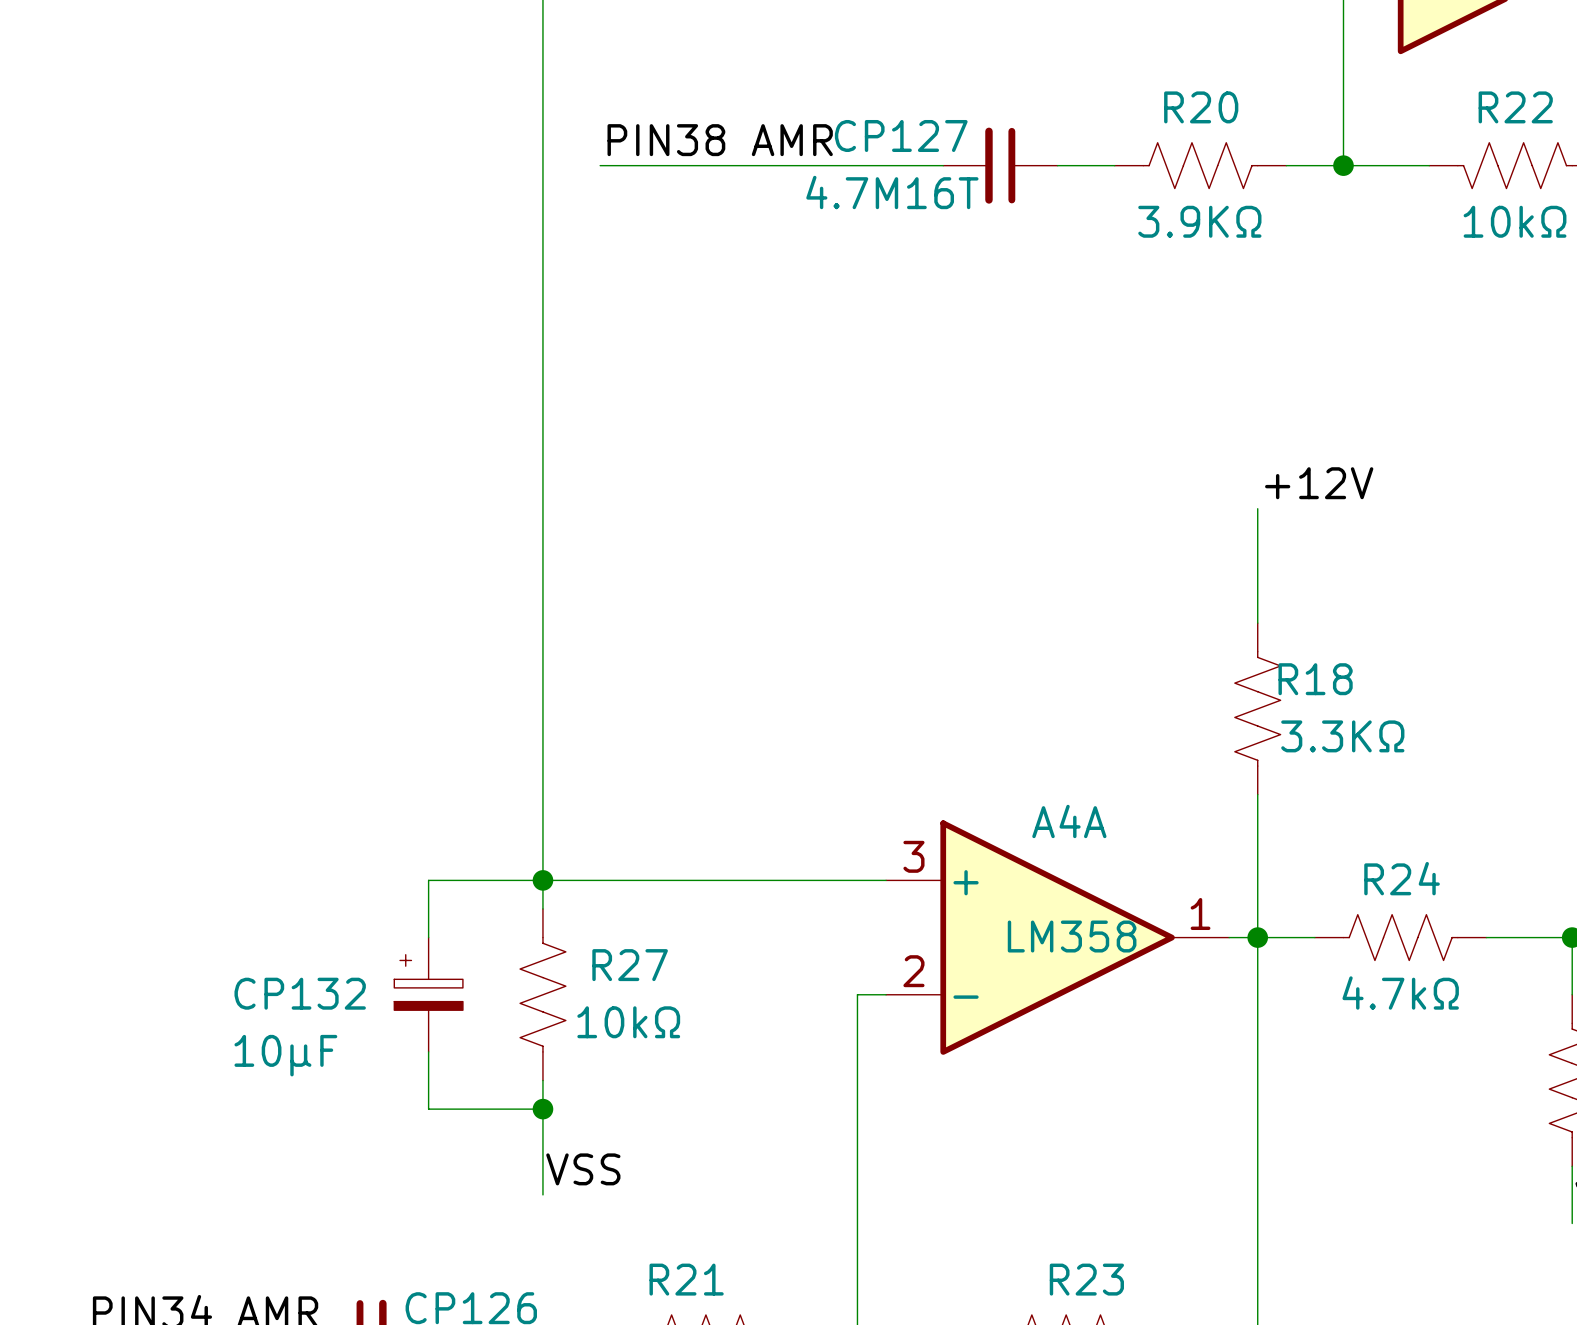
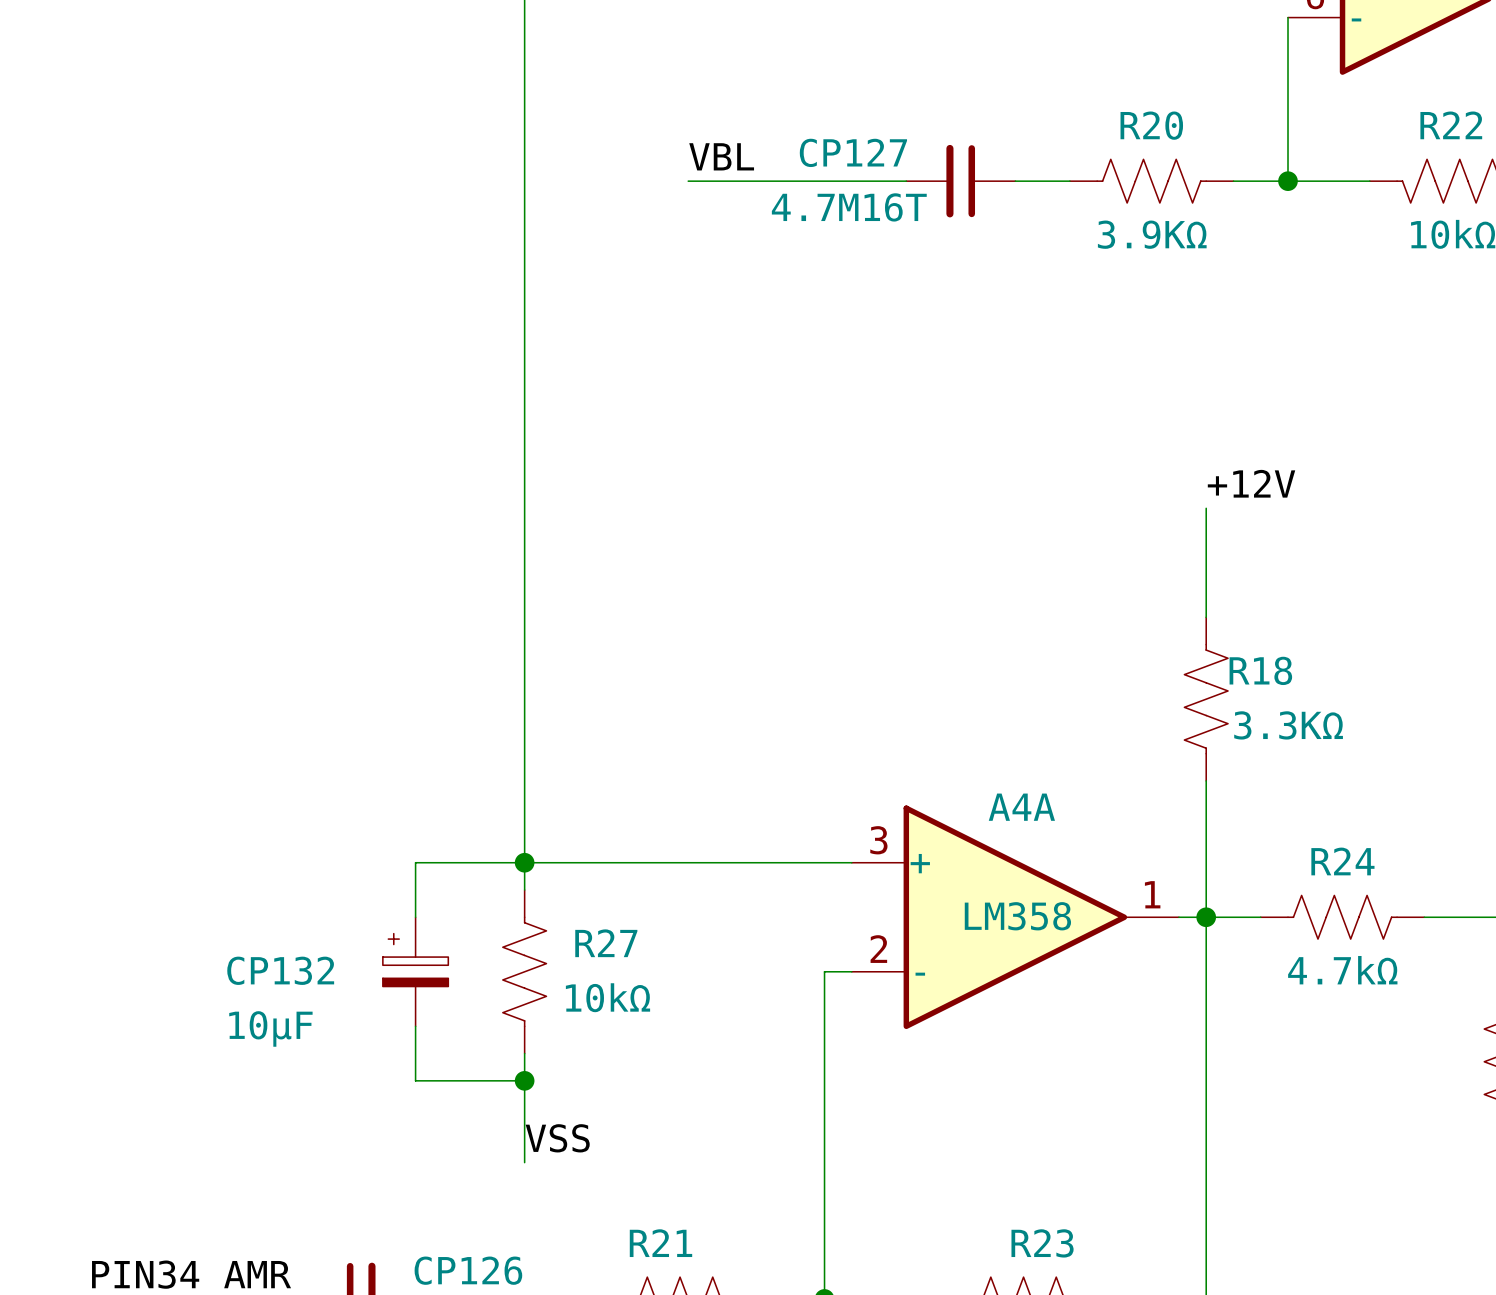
label: PIN38 AMR (720, 140) -> none
label: none -> VBL (721, 156)
wire: (600, 165) (714, 165) -> none

